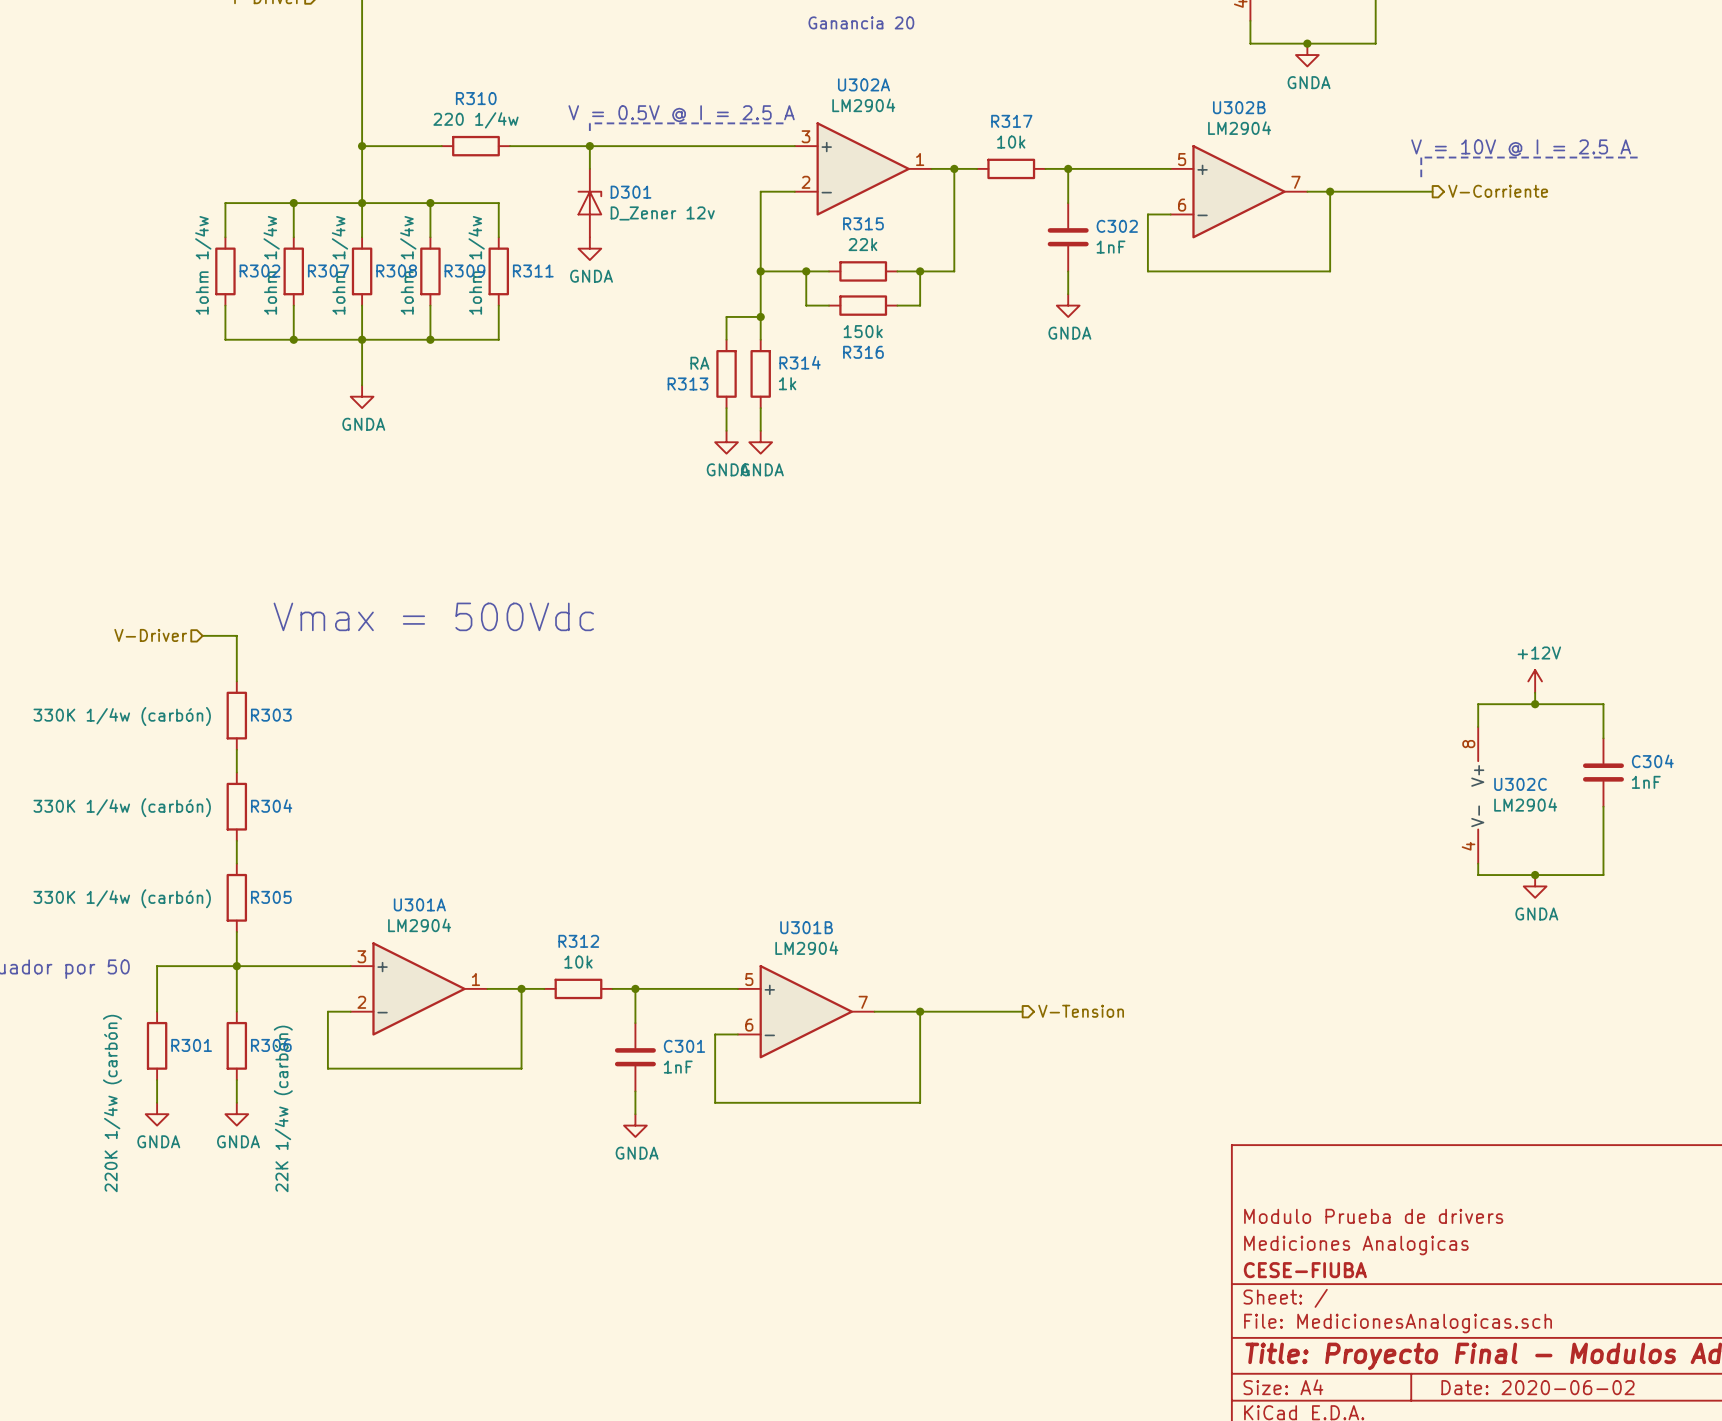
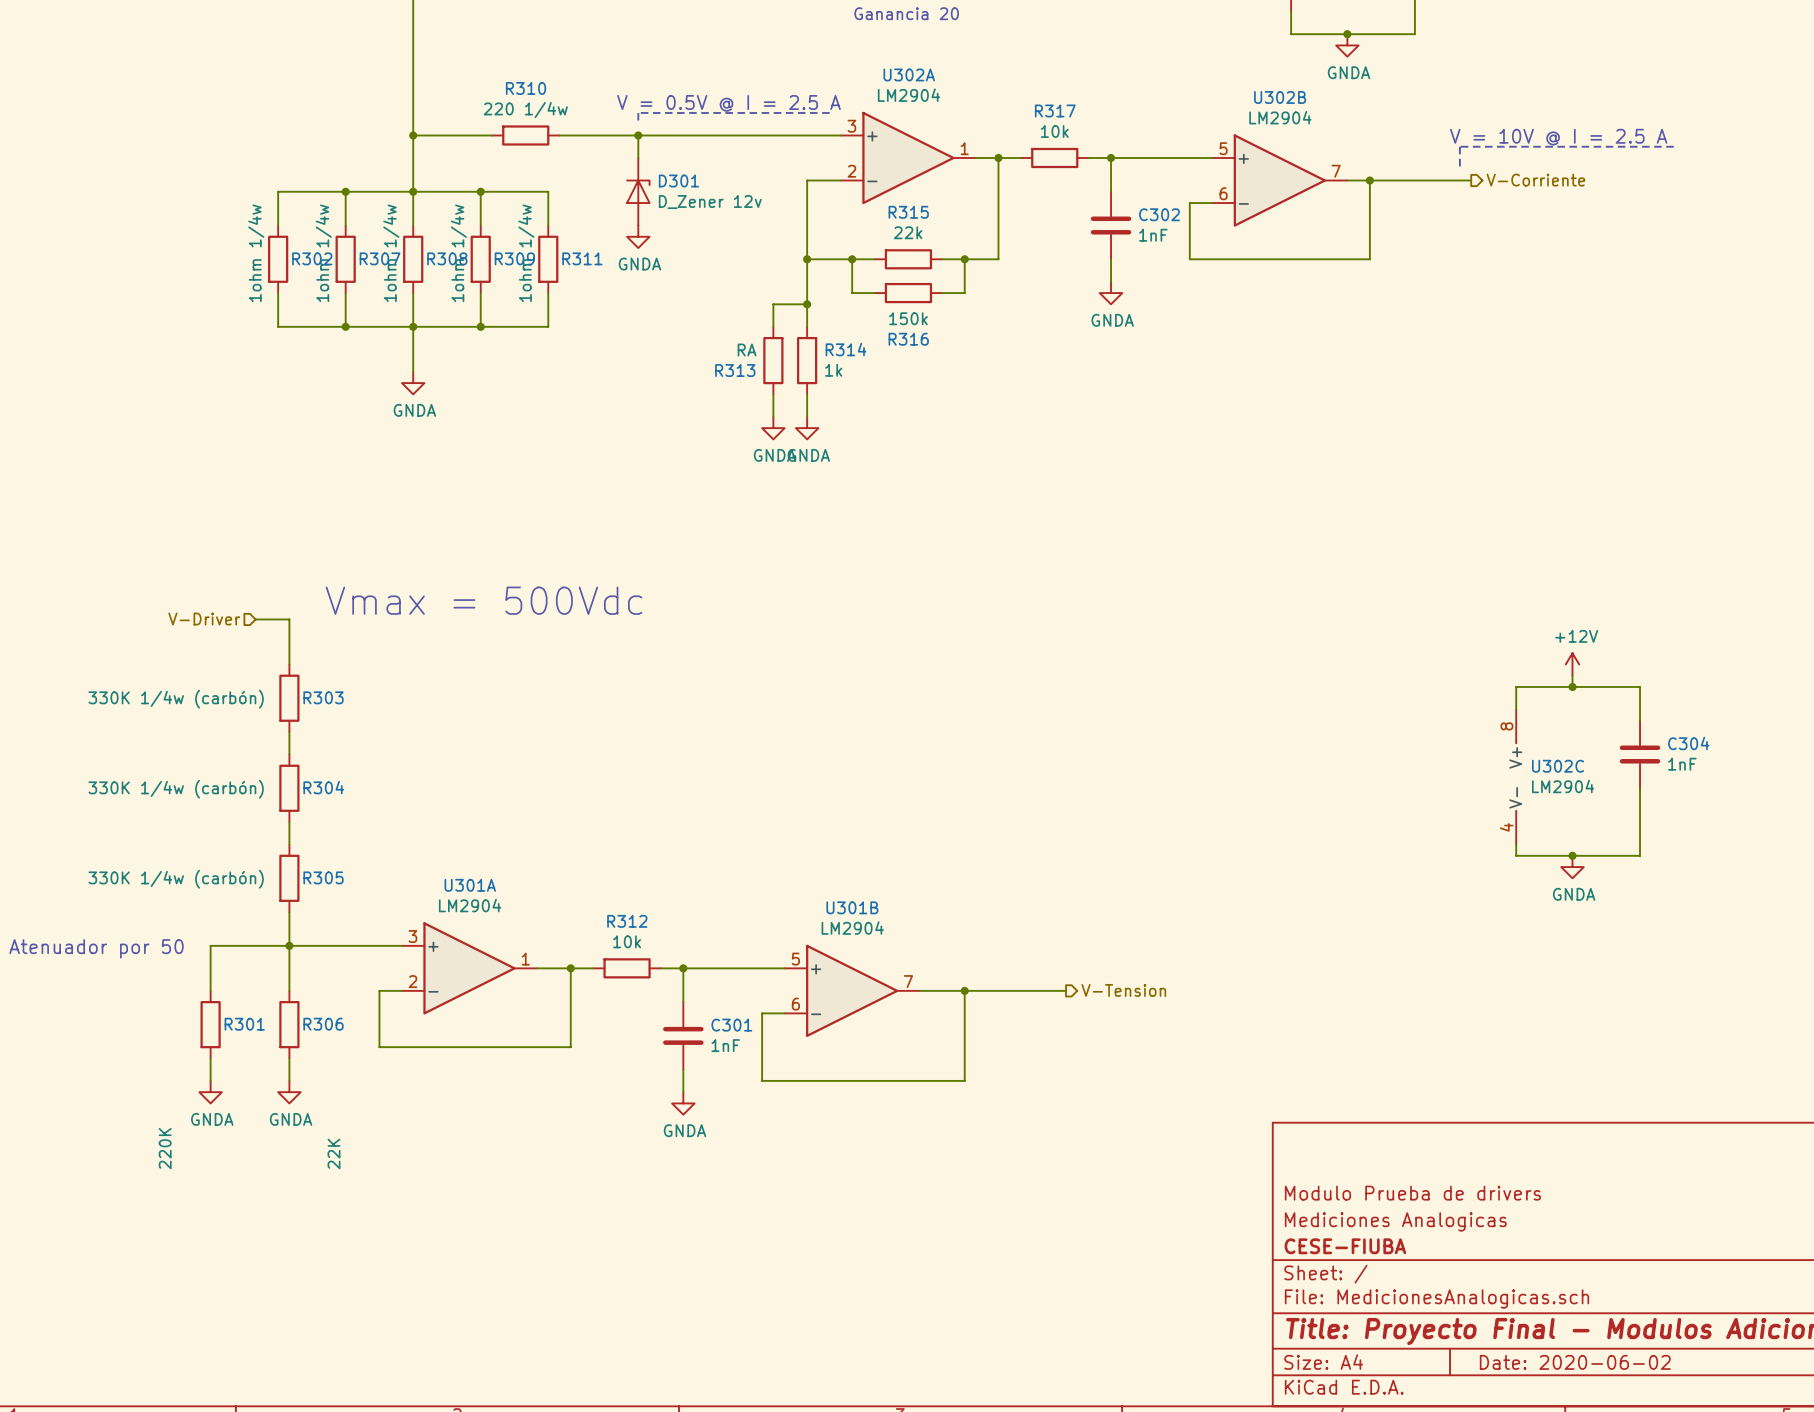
R301 value: 220K 1/4w (carbón) (112, 1103) -> 220K (165, 1148)
R306 value: 22K 1/4w (carbón) (283, 1108) -> 22K (334, 1153)

